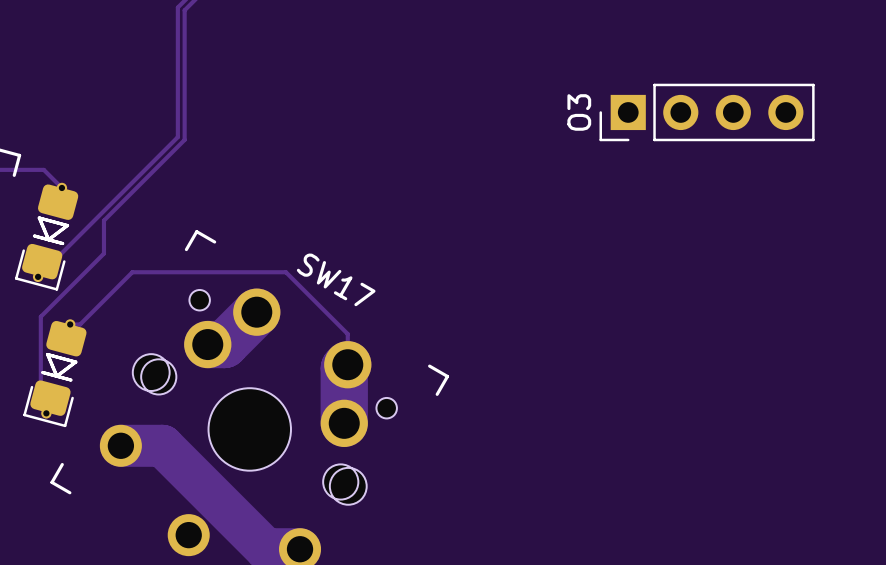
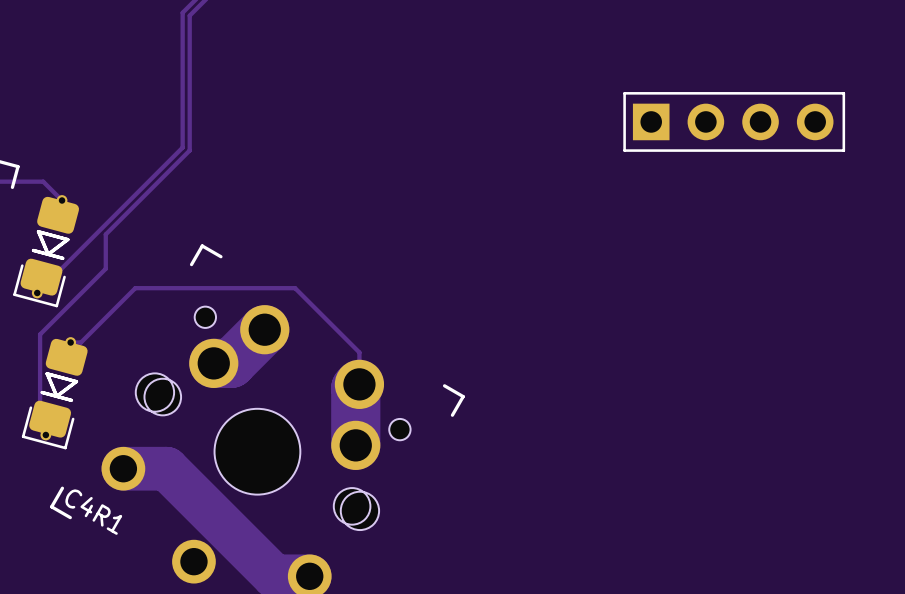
O3: (707, 112) -> none
part: none -> (734, 121)
SW17 name: SW17 (336, 279) -> none
text: none -> C4R1 (93, 512)

